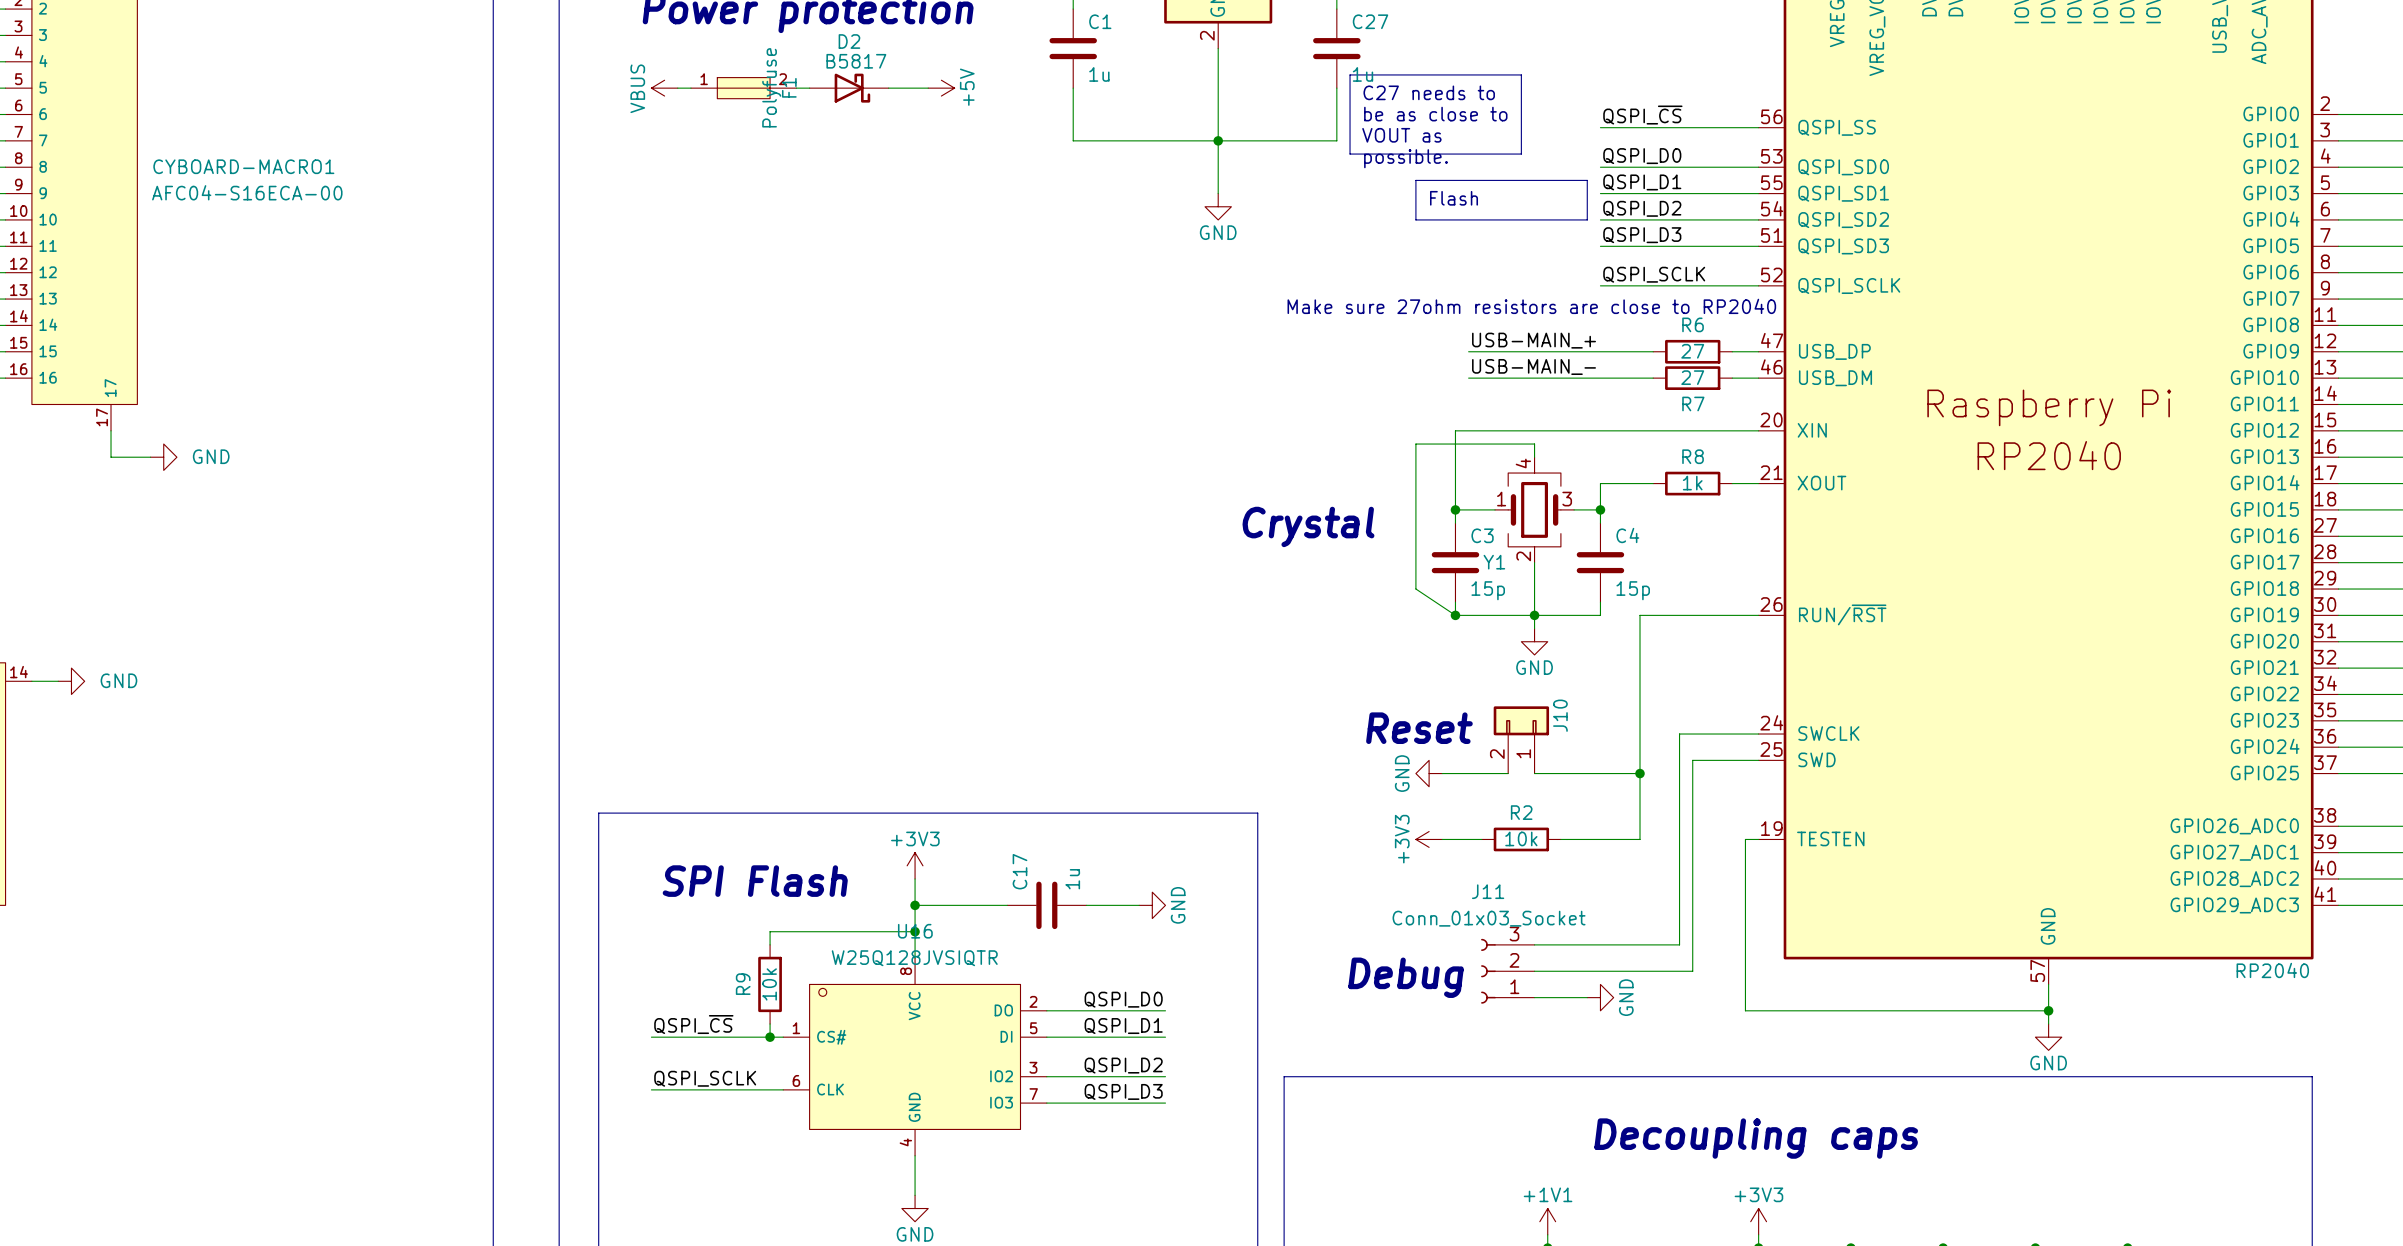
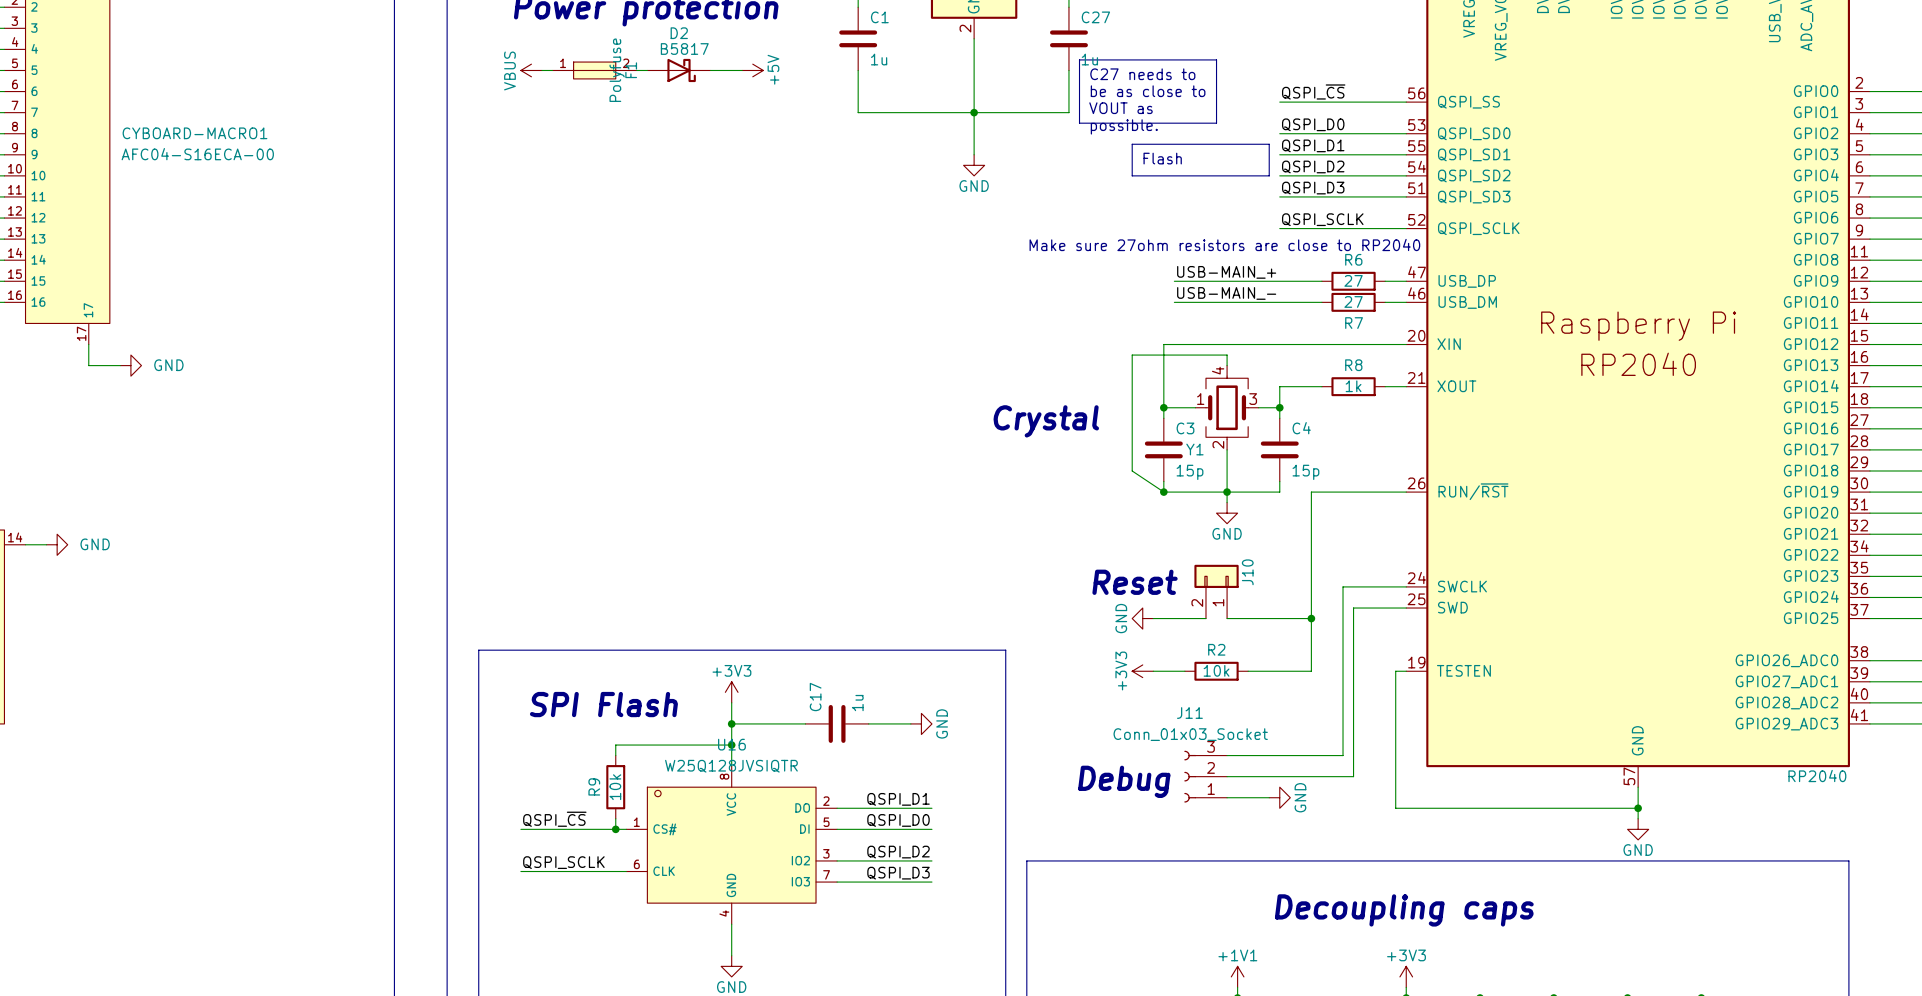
label: QSPI_D0 (1123, 999) -> QSPI_D1 (898, 799)
label: QSPI_D1 (1123, 1026) -> QSPI_D0 (898, 820)

